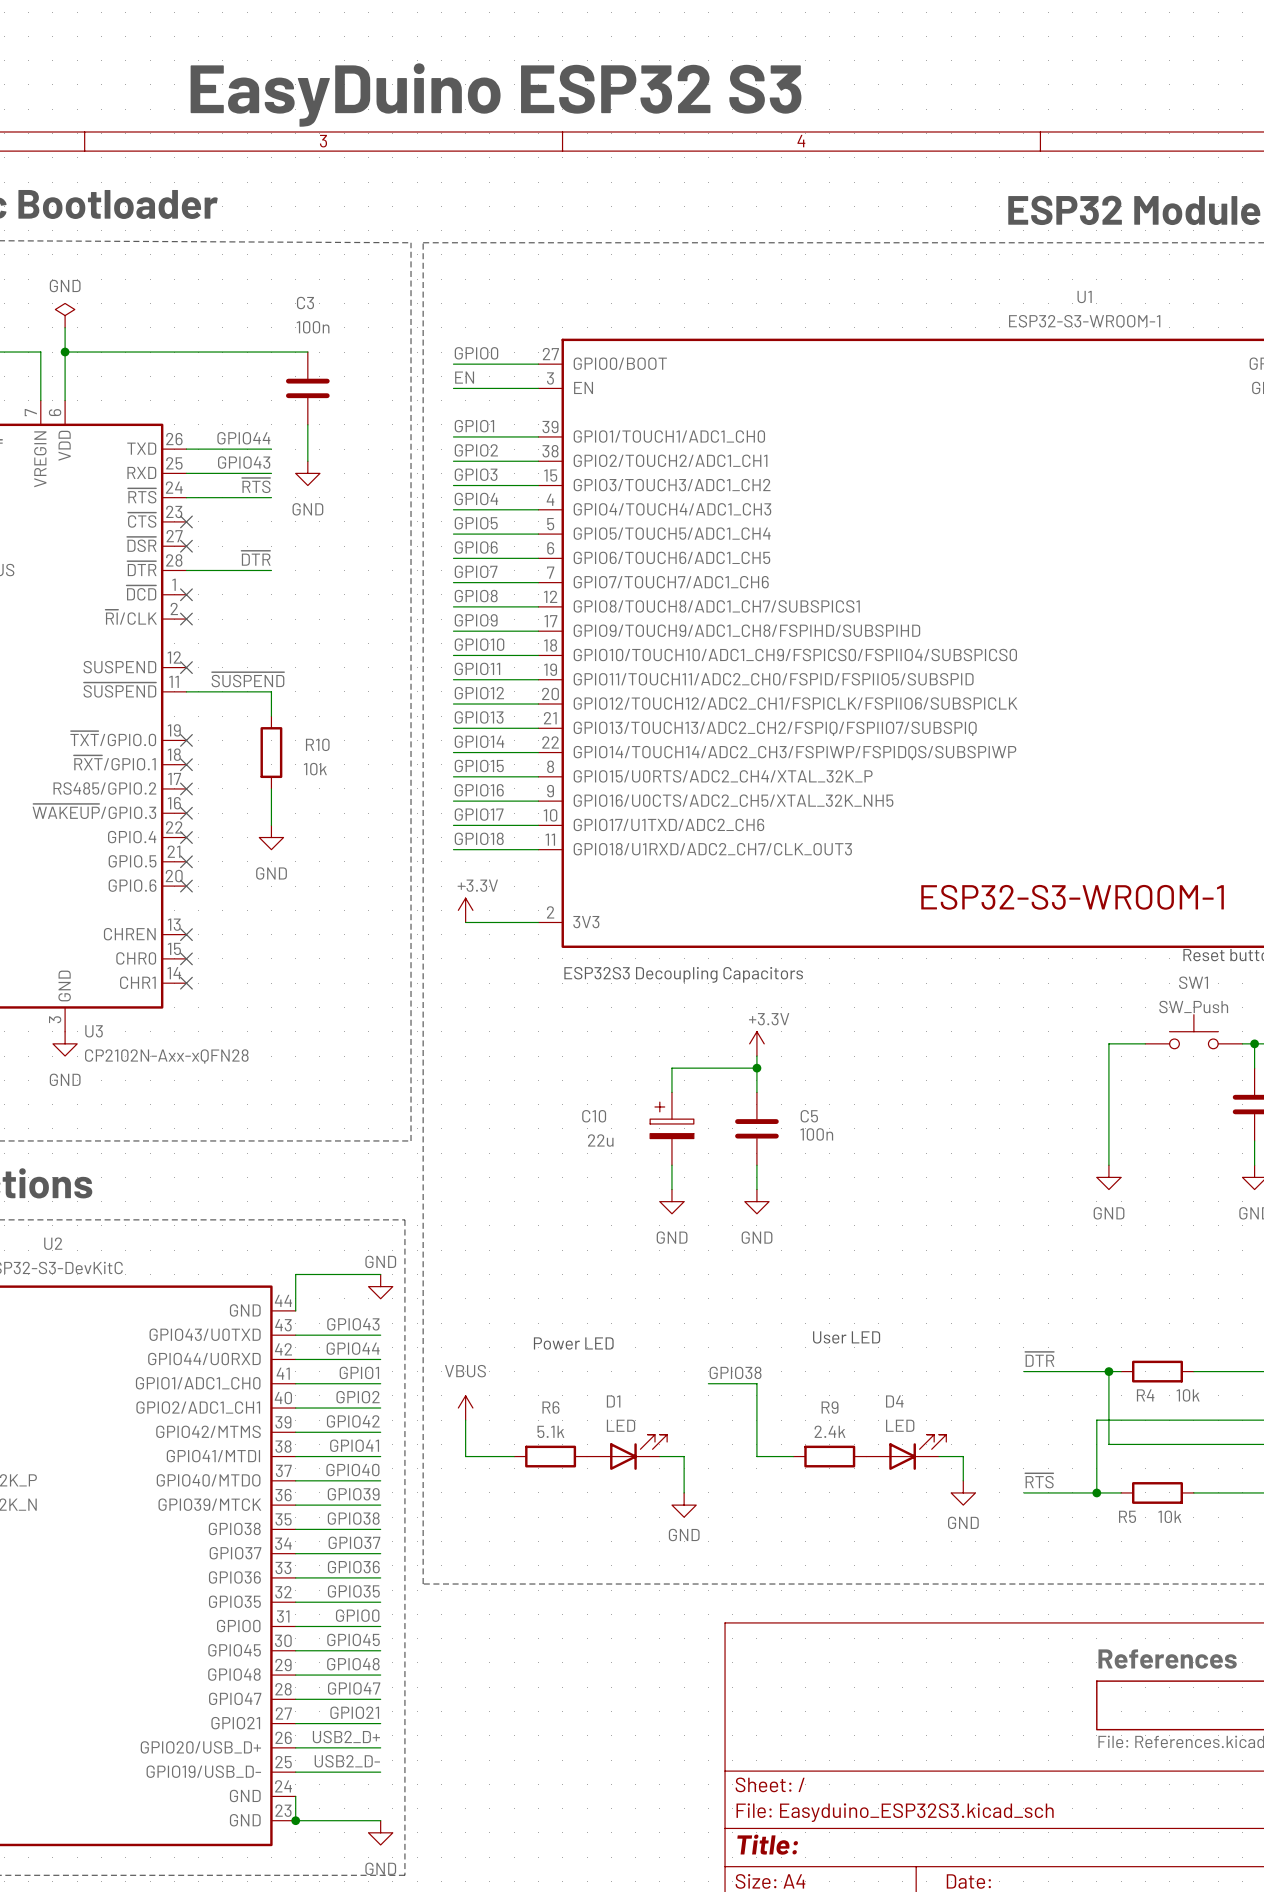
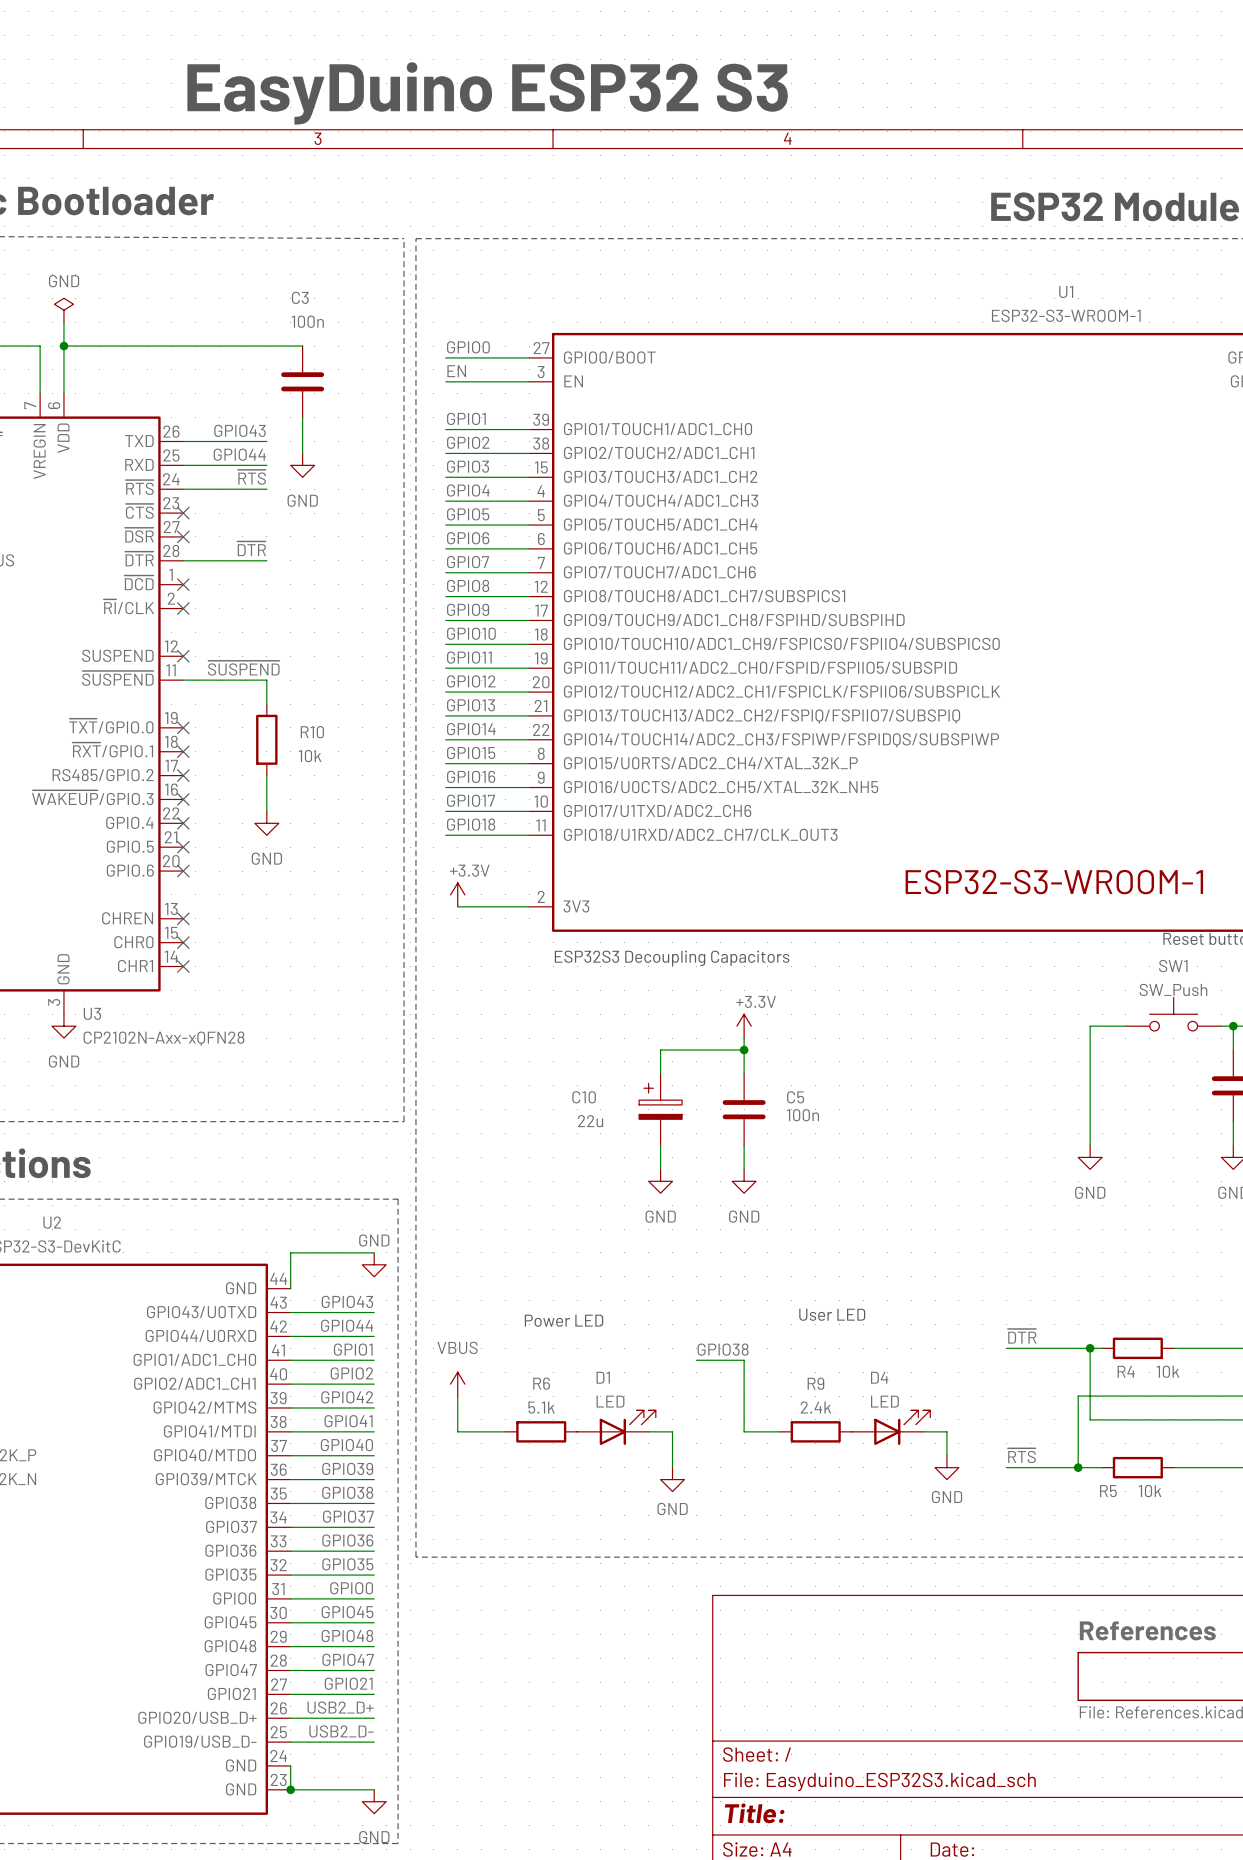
label: GPIO44 (243, 438) -> GPIO43 (240, 430)
label: GPIO43 (244, 462) -> GPIO44 (239, 454)

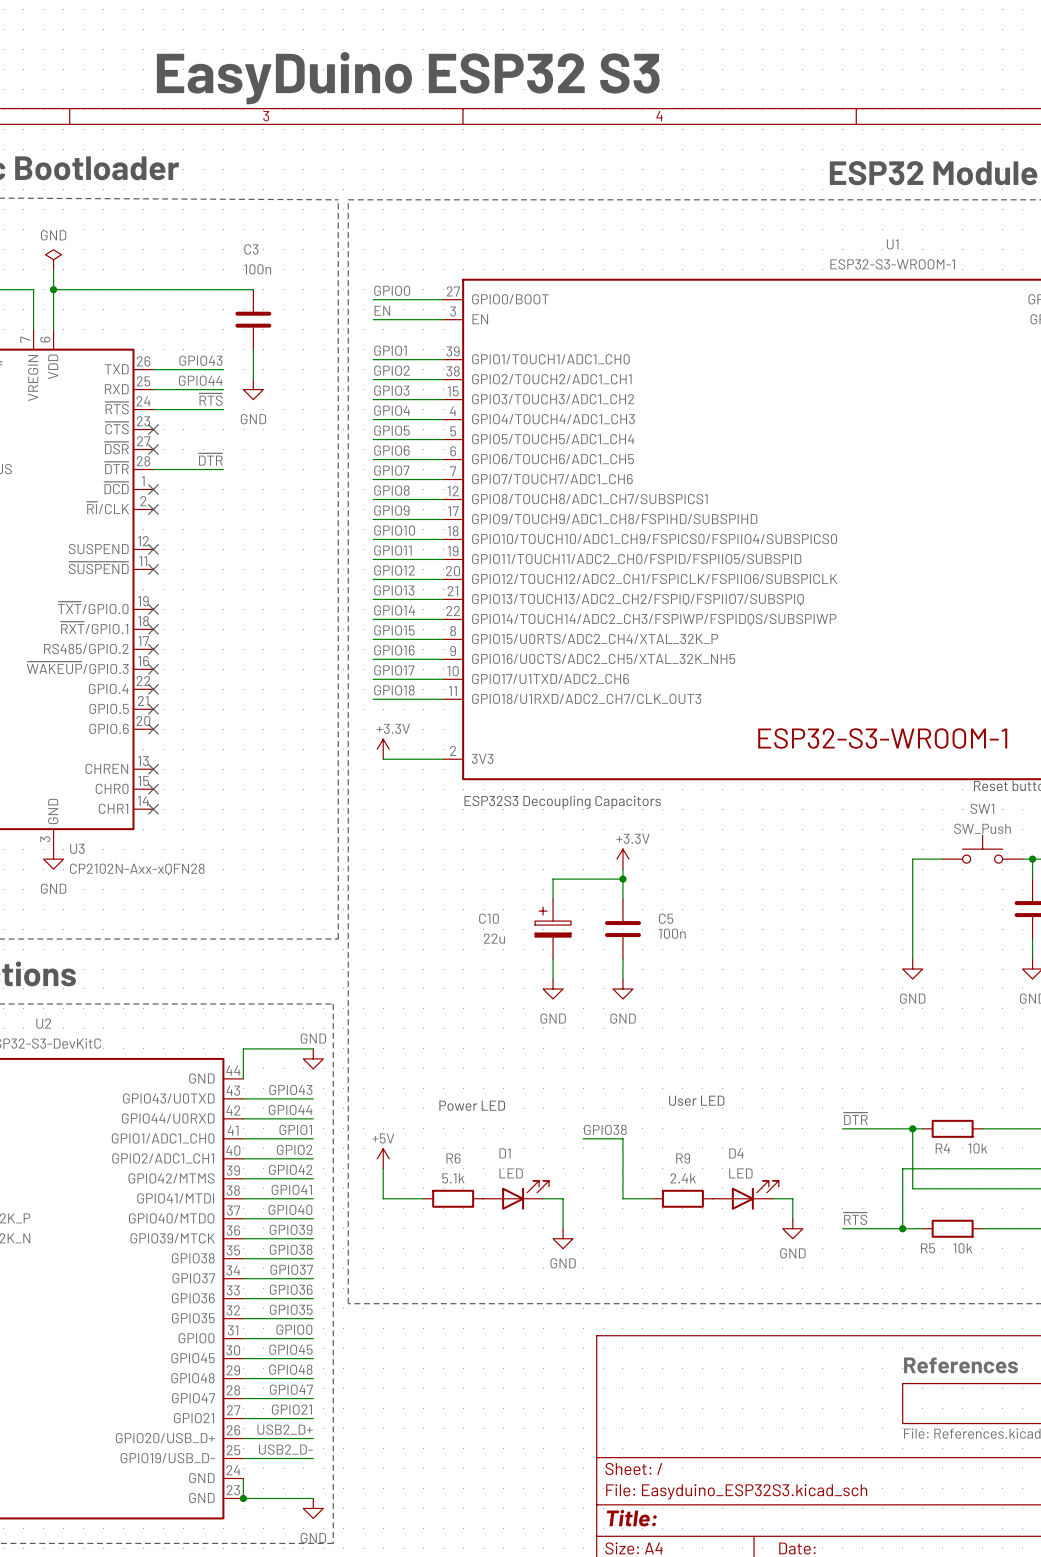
label: ~{SUSPEND} (243, 668) -> none
wire: (183, 680) (266, 680) (266, 704) -> none
no-connect mark: none -> (153, 569)
R10: 10k (266, 739) -> none
wire: (266, 775) (266, 811) -> none
power symbol: GND (266, 823) -> none
power symbol: VBUS (457, 1384) -> +5V (383, 1158)

